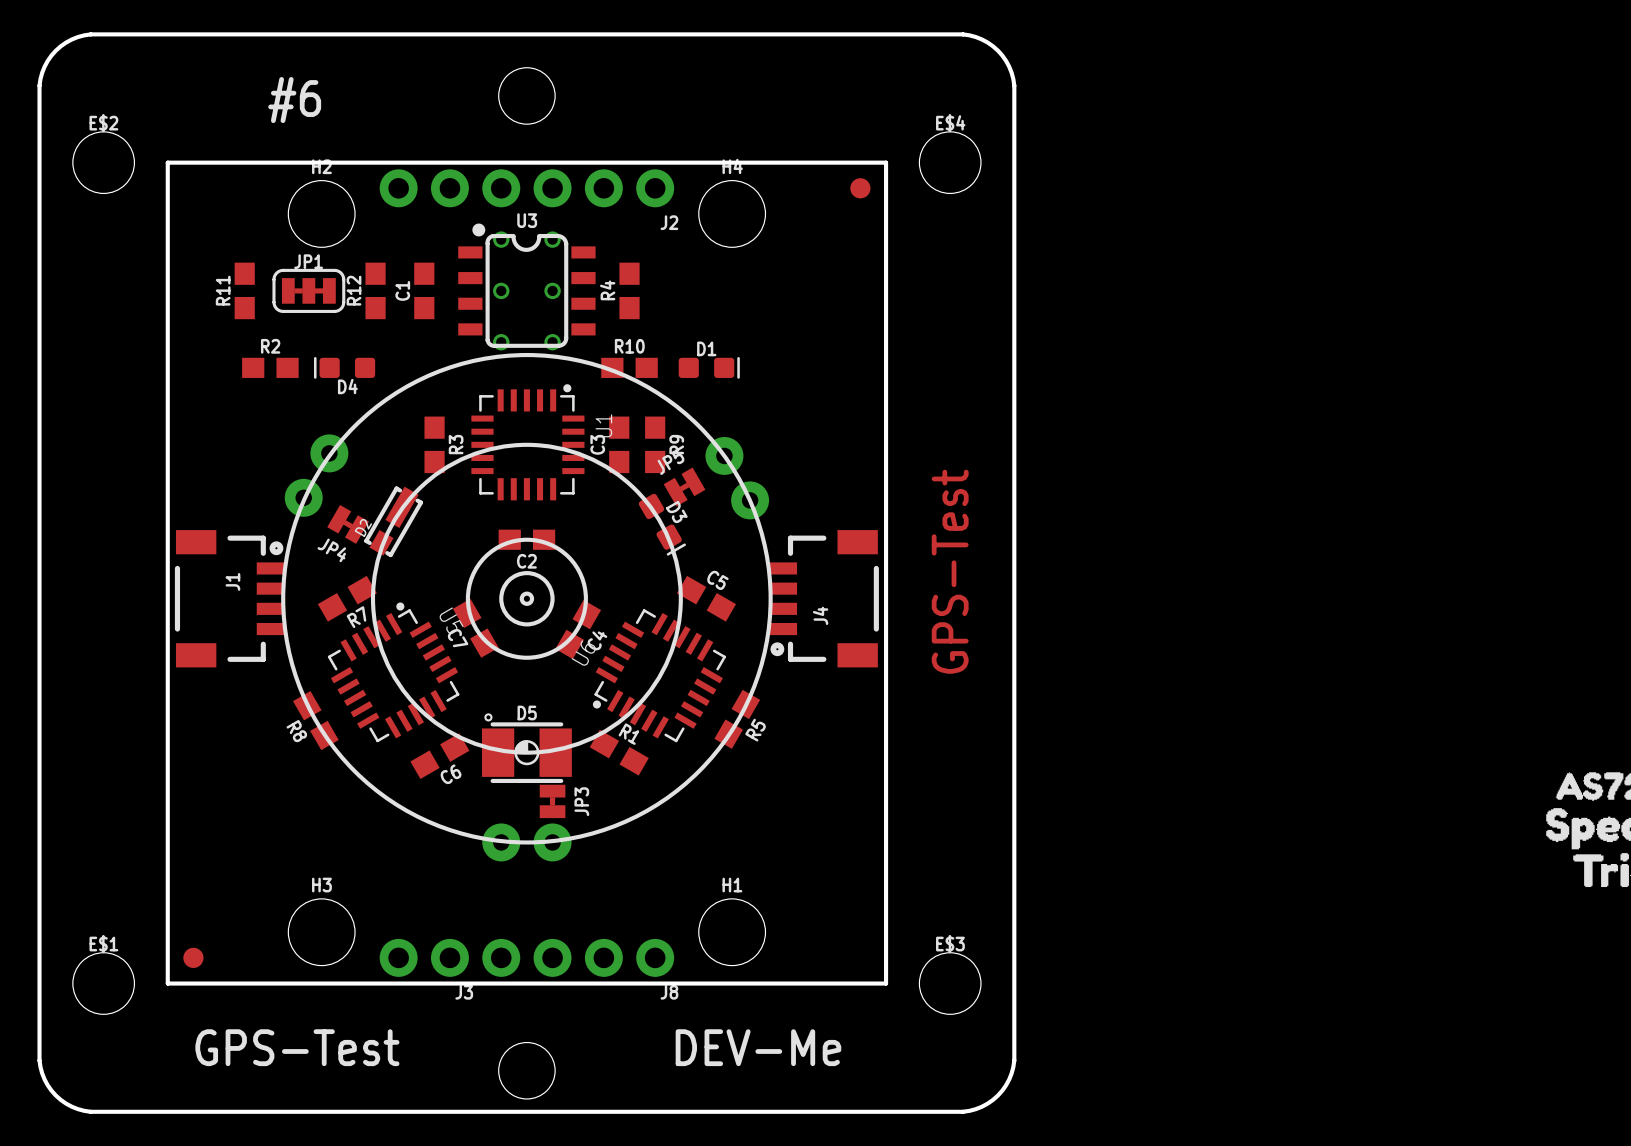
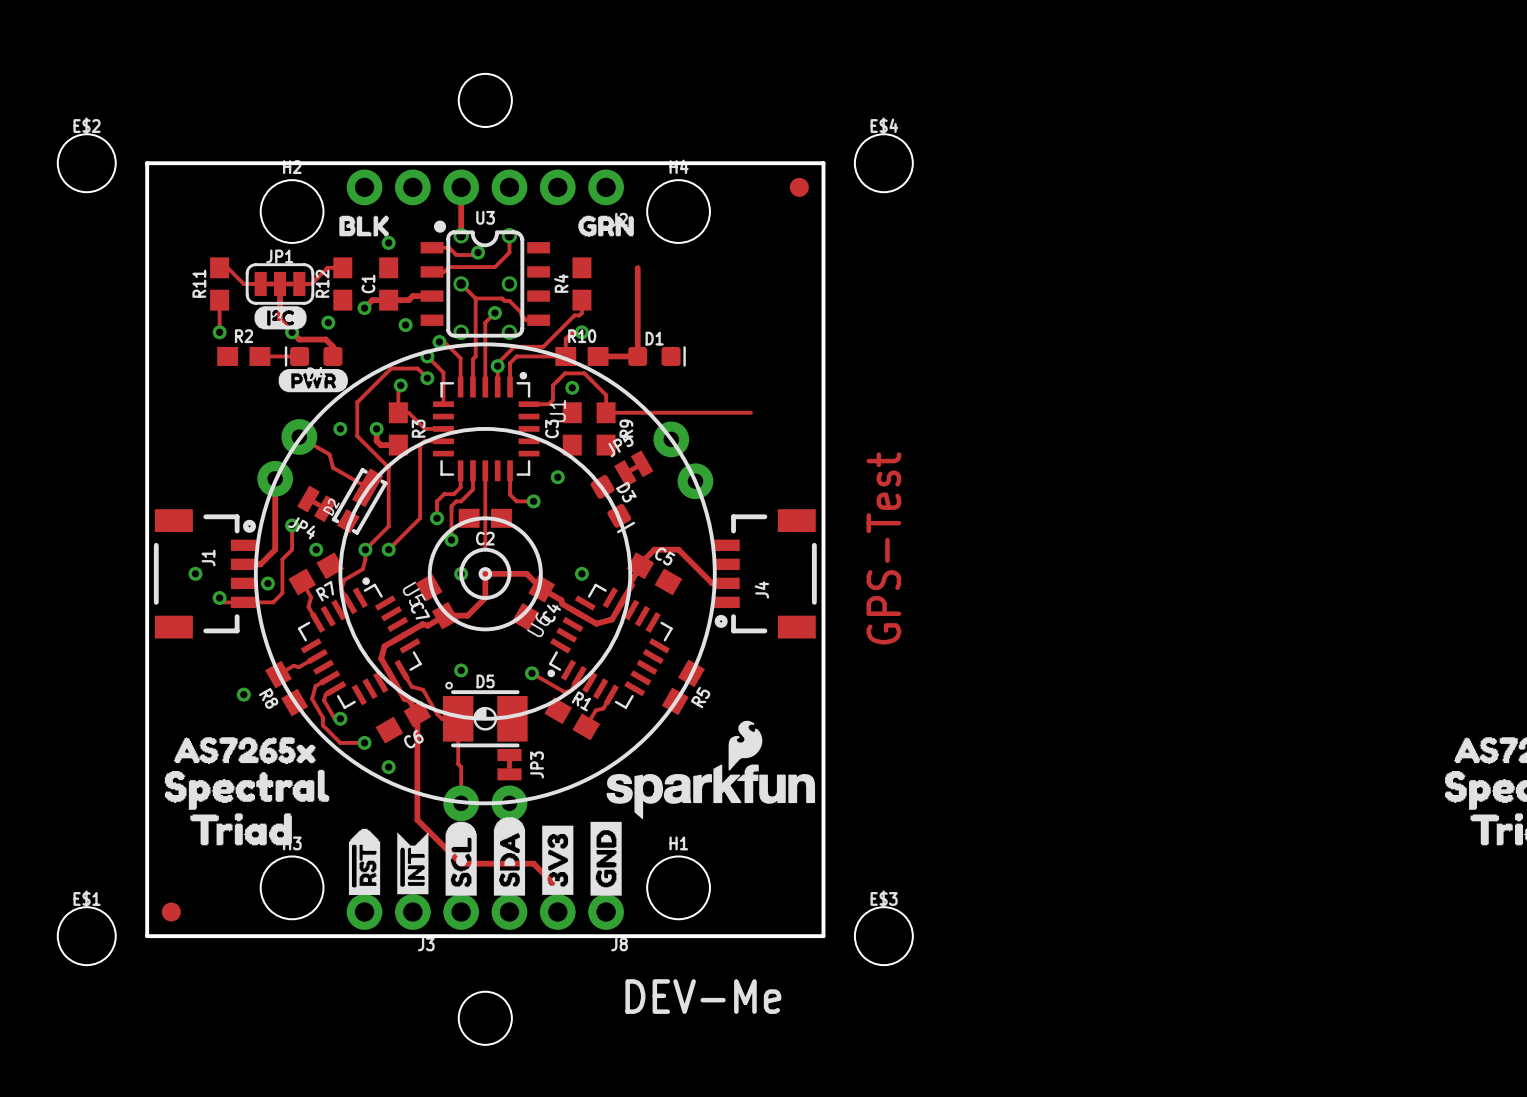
board edge: (90, 34) (963, 34) (975, 37) (987, 42) (1002, 55) (1011, 72) (1014, 85) (1014, 1060) (1011, 1073) (1006, 1085) (993, 1099) (975, 1109) (963, 1111) (90, 1111) (77, 1109) (66, 1103) (51, 1090) (42, 1073) (39, 1060) (39, 85) (44, 66) (55, 50) (71, 39) (90, 34) -> none
text: #6 (294, 100) -> none
track: none -> (461, 187) (461, 235)
drawing: none -> [339, 215, 389, 237]
drawing: none -> [578, 215, 634, 238]
track: none -> (509, 235) (509, 252) (494, 267) (449, 267) (444, 271) (432, 271)
via: none -> (388, 242)
track: none -> (432, 247) (449, 247) (456, 255) (475, 255) (478, 252)
via: none -> (478, 252)
track: none -> (219, 267) (227, 267) (243, 284) (260, 284)
track: none -> (342, 267) (327, 267) (311, 284) (299, 284)
track: none -> (637, 268) (637, 356) (598, 356)
track: none -> (280, 284) (280, 320) (299, 339) (325, 339) (332, 346) (332, 356)
track: none -> (461, 284) (475, 298)
track: none -> (432, 296) (412, 296) (408, 300) (372, 300) (364, 308)
track: none -> (475, 298) (475, 356) (472, 359) (472, 387)
track: none -> (475, 298) (502, 298) (504, 300) (509, 300) (526, 320) (538, 320)
track: none -> (219, 300) (219, 332)
track: none -> (581, 300) (581, 312) (579, 315) (574, 315) (543, 346) (514, 346) (497, 363) (497, 387)
drawing: none -> [254, 306, 307, 330]
via: none -> (364, 308)
track: none -> (494, 312) (485, 322) (485, 387)
via: none -> (494, 312)
via: none -> (328, 322)
via: none -> (405, 325)
via: none -> (219, 332)
via: none -> (292, 332)
track: none -> (581, 332) (572, 332) (565, 338) (565, 356) (516, 356) (510, 363) (510, 387)
via: none -> (581, 332)
track: none -> (439, 341) (444, 341) (460, 358) (460, 387)
via: none -> (439, 341)
track: none -> (259, 356) (299, 356)
track: none -> (427, 356) (443, 372) (443, 404)
via: none -> (427, 356)
via: none -> (497, 366)
drawing: none -> [278, 369, 348, 393]
track: none -> (427, 378) (417, 368) (391, 368) (357, 402) (357, 436) (388, 467) (388, 526) (365, 549) (362, 569) (343, 580) (341, 589) (349, 603)
via: none -> (427, 378)
track: none -> (400, 385) (398, 387) (398, 412) (408, 412) (424, 428) (443, 428)
via: none -> (400, 385)
via: none -> (572, 387)
track: none -> (529, 404) (548, 404) (552, 399) (552, 385) (565, 373) (584, 373) (606, 395) (606, 412) (751, 412)
via: none -> (340, 428)
track: none -> (376, 428) (376, 441) (380, 445) (398, 445)
via: none -> (376, 428)
track: none -> (299, 436) (329, 454) (333, 467) (367, 487)
track: none -> (443, 441) (424, 441) (420, 445) (420, 518) (388, 549)
track: none -> (460, 470) (460, 487) (453, 494) (444, 494) (437, 501) (437, 518)
track: none -> (472, 470) (472, 489) (461, 501) (456, 501) (451, 506) (451, 540)
track: none -> (485, 470) (485, 549)
track: none -> (510, 470) (510, 494) (516, 501) (533, 501)
via: none -> (557, 477)
track: none -> (275, 478) (275, 549) (260, 564) (243, 564)
via: none -> (533, 501)
via: none -> (437, 518)
track: none -> (292, 525) (292, 549) (282, 559) (282, 593) (273, 602) (223, 602) (219, 598)
via: none -> (292, 525)
via: none -> (451, 540)
via: none -> (316, 549)
via: none -> (365, 549)
via: none -> (388, 549)
via: none -> (195, 573)
via: none -> (461, 573)
via: none -> (581, 573)
track: none -> (302, 581) (311, 597) (308, 606) (317, 622)
track: none -> (726, 583) (712, 583) (678, 549) (654, 549) (640, 563) (630, 582) (631, 585) (612, 619) (596, 623) (562, 604) (561, 600) (541, 588) (526, 573) (485, 573) (485, 598) (467, 615) (445, 615) (427, 625) (422, 624) (384, 646) (381, 658) (404, 698) (409, 700) (417, 713) (417, 819) (461, 863) (533, 863) (557, 887) (557, 912)
via: none -> (267, 583)
via: none -> (219, 598)
track: none -> (317, 656) (298, 667) (293, 665) (278, 674)
track: none -> (402, 670) (411, 686) (423, 689) (441, 718) (458, 718)
via: none -> (461, 670)
track: none -> (531, 673) (564, 692) (570, 690) (579, 676)
via: none -> (531, 673)
track: none -> (329, 677) (315, 686) (312, 698) (322, 717) (322, 725) (340, 742) (364, 742)
track: none -> (335, 688) (325, 694) (324, 700) (334, 719) (340, 718)
via: none -> (243, 694)
track: none -> (611, 694) (603, 708) (595, 710) (586, 726)
via: none -> (340, 718)
track: none -> (458, 718) (458, 764) (461, 767) (461, 803)
drawing: none -> [348, 720, 816, 896]
drawing: none -> [164, 737, 330, 846]
via: none -> (364, 742)
via: none -> (388, 767)
text: GPS-Test (297, 1047) -> none

